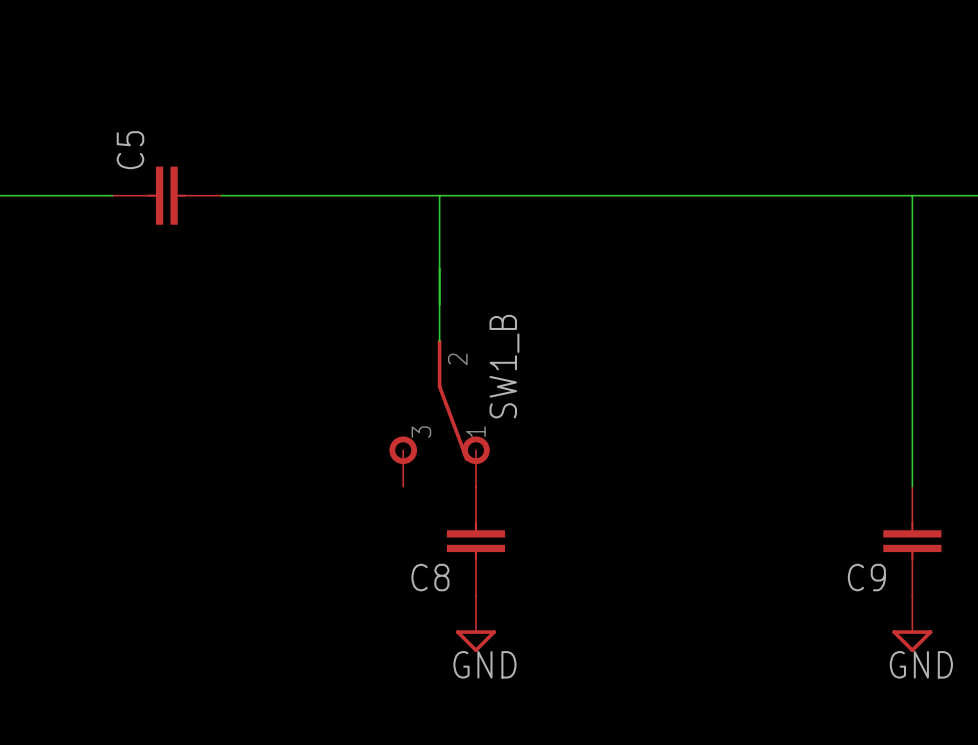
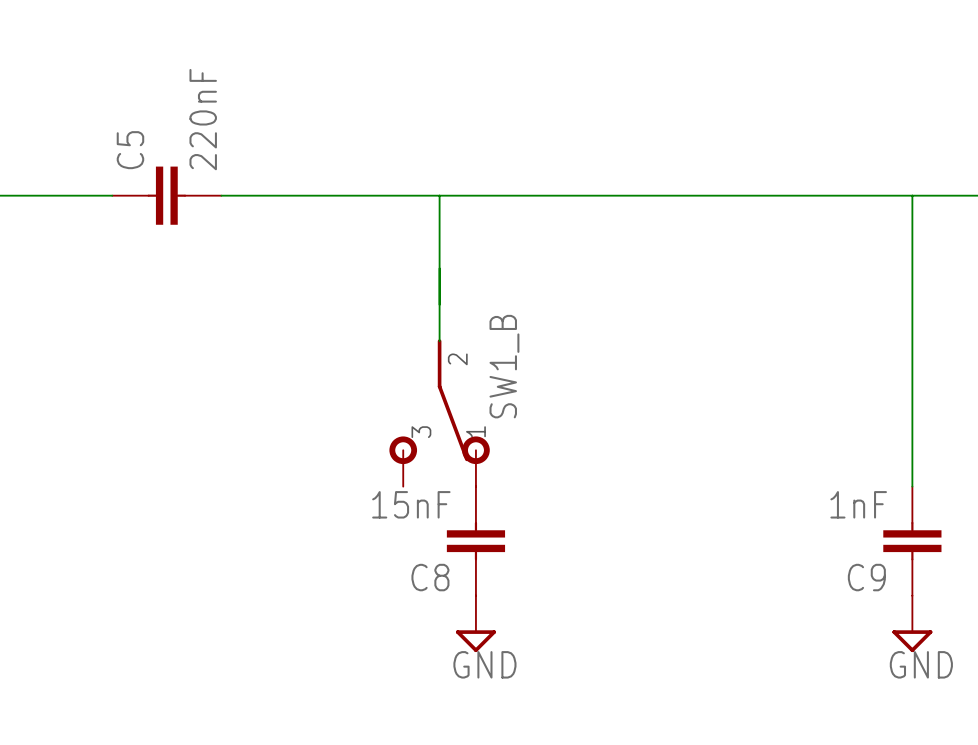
C5 value: none -> 220nF (203, 119)
C8 value: none -> 15nF (411, 504)
C9 value: none -> 1nF (858, 504)

